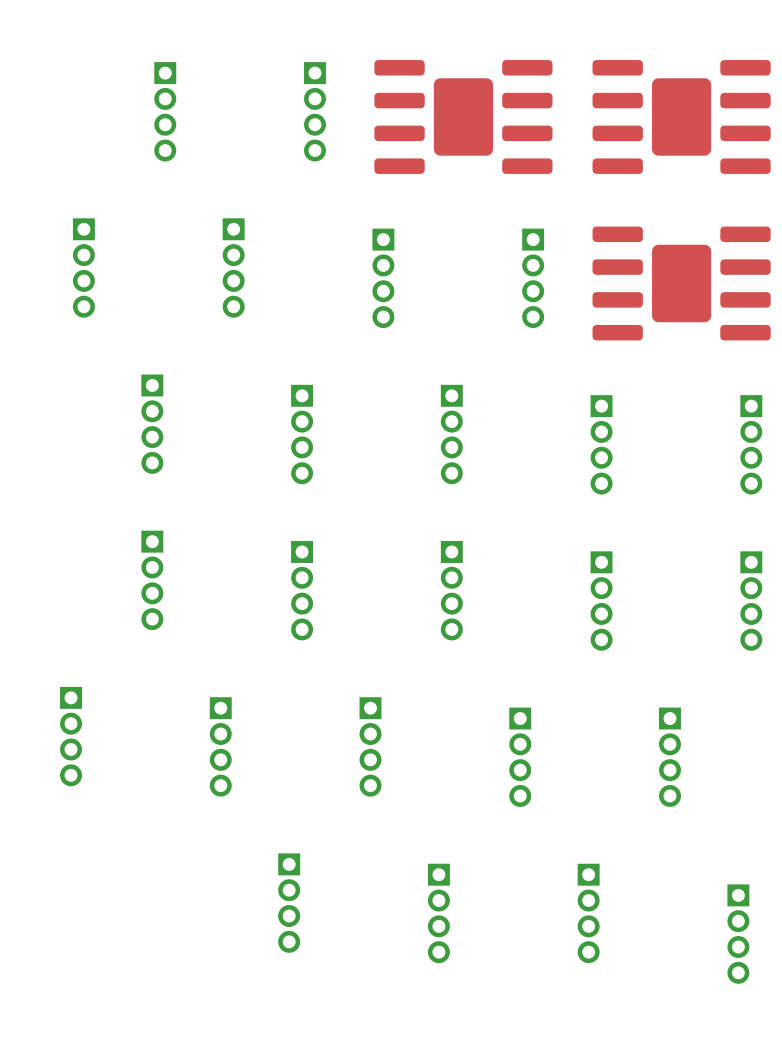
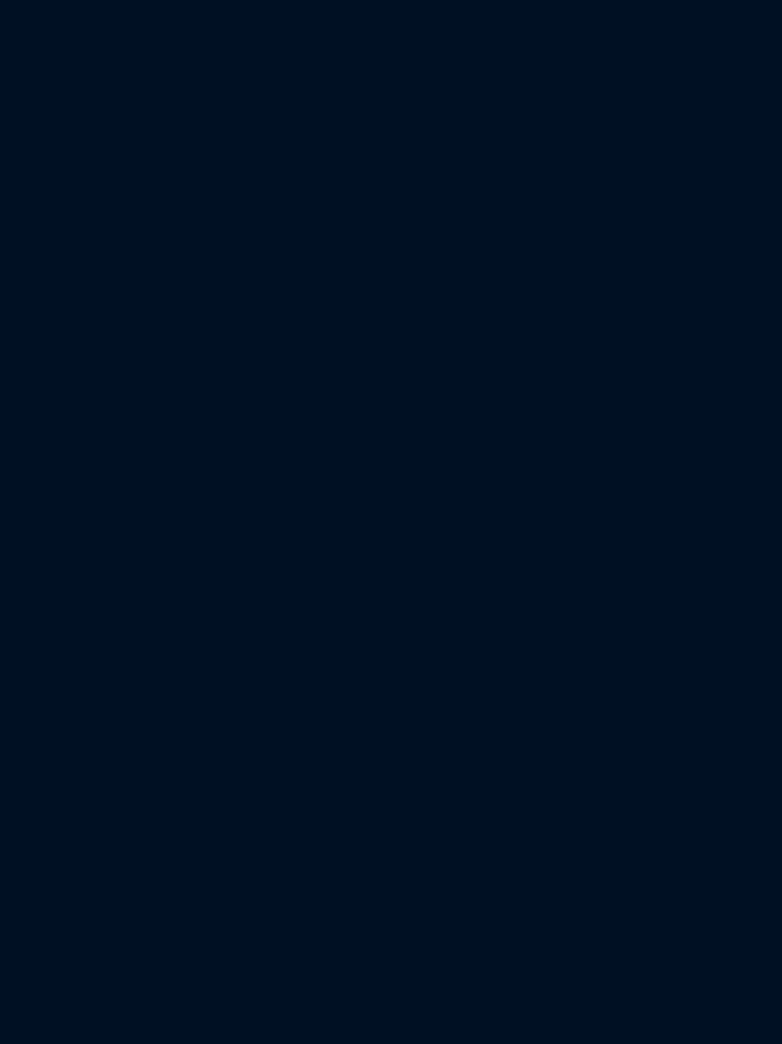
part: (165, 111) -> none
part: (314, 111) -> none
part: (463, 116) -> none
part: (681, 116) -> none
part: (83, 268) -> none
part: (233, 268) -> none
part: (383, 278) -> none
part: (533, 278) -> none
part: (681, 283) -> none
part: (152, 424) -> none
part: (302, 434) -> none
part: (451, 434) -> none
part: (601, 444) -> none
part: (751, 444) -> none
part: (152, 580) -> none
part: (302, 590) -> none
part: (451, 590) -> none
part: (601, 601) -> none
part: (751, 601) -> none
part: (71, 736) -> none
part: (220, 746) -> none
part: (370, 746) -> none
part: (520, 757) -> none
part: (669, 757) -> none
part: (289, 903) -> none
part: (438, 913) -> none
part: (588, 913) -> none
part: (738, 934) -> none

